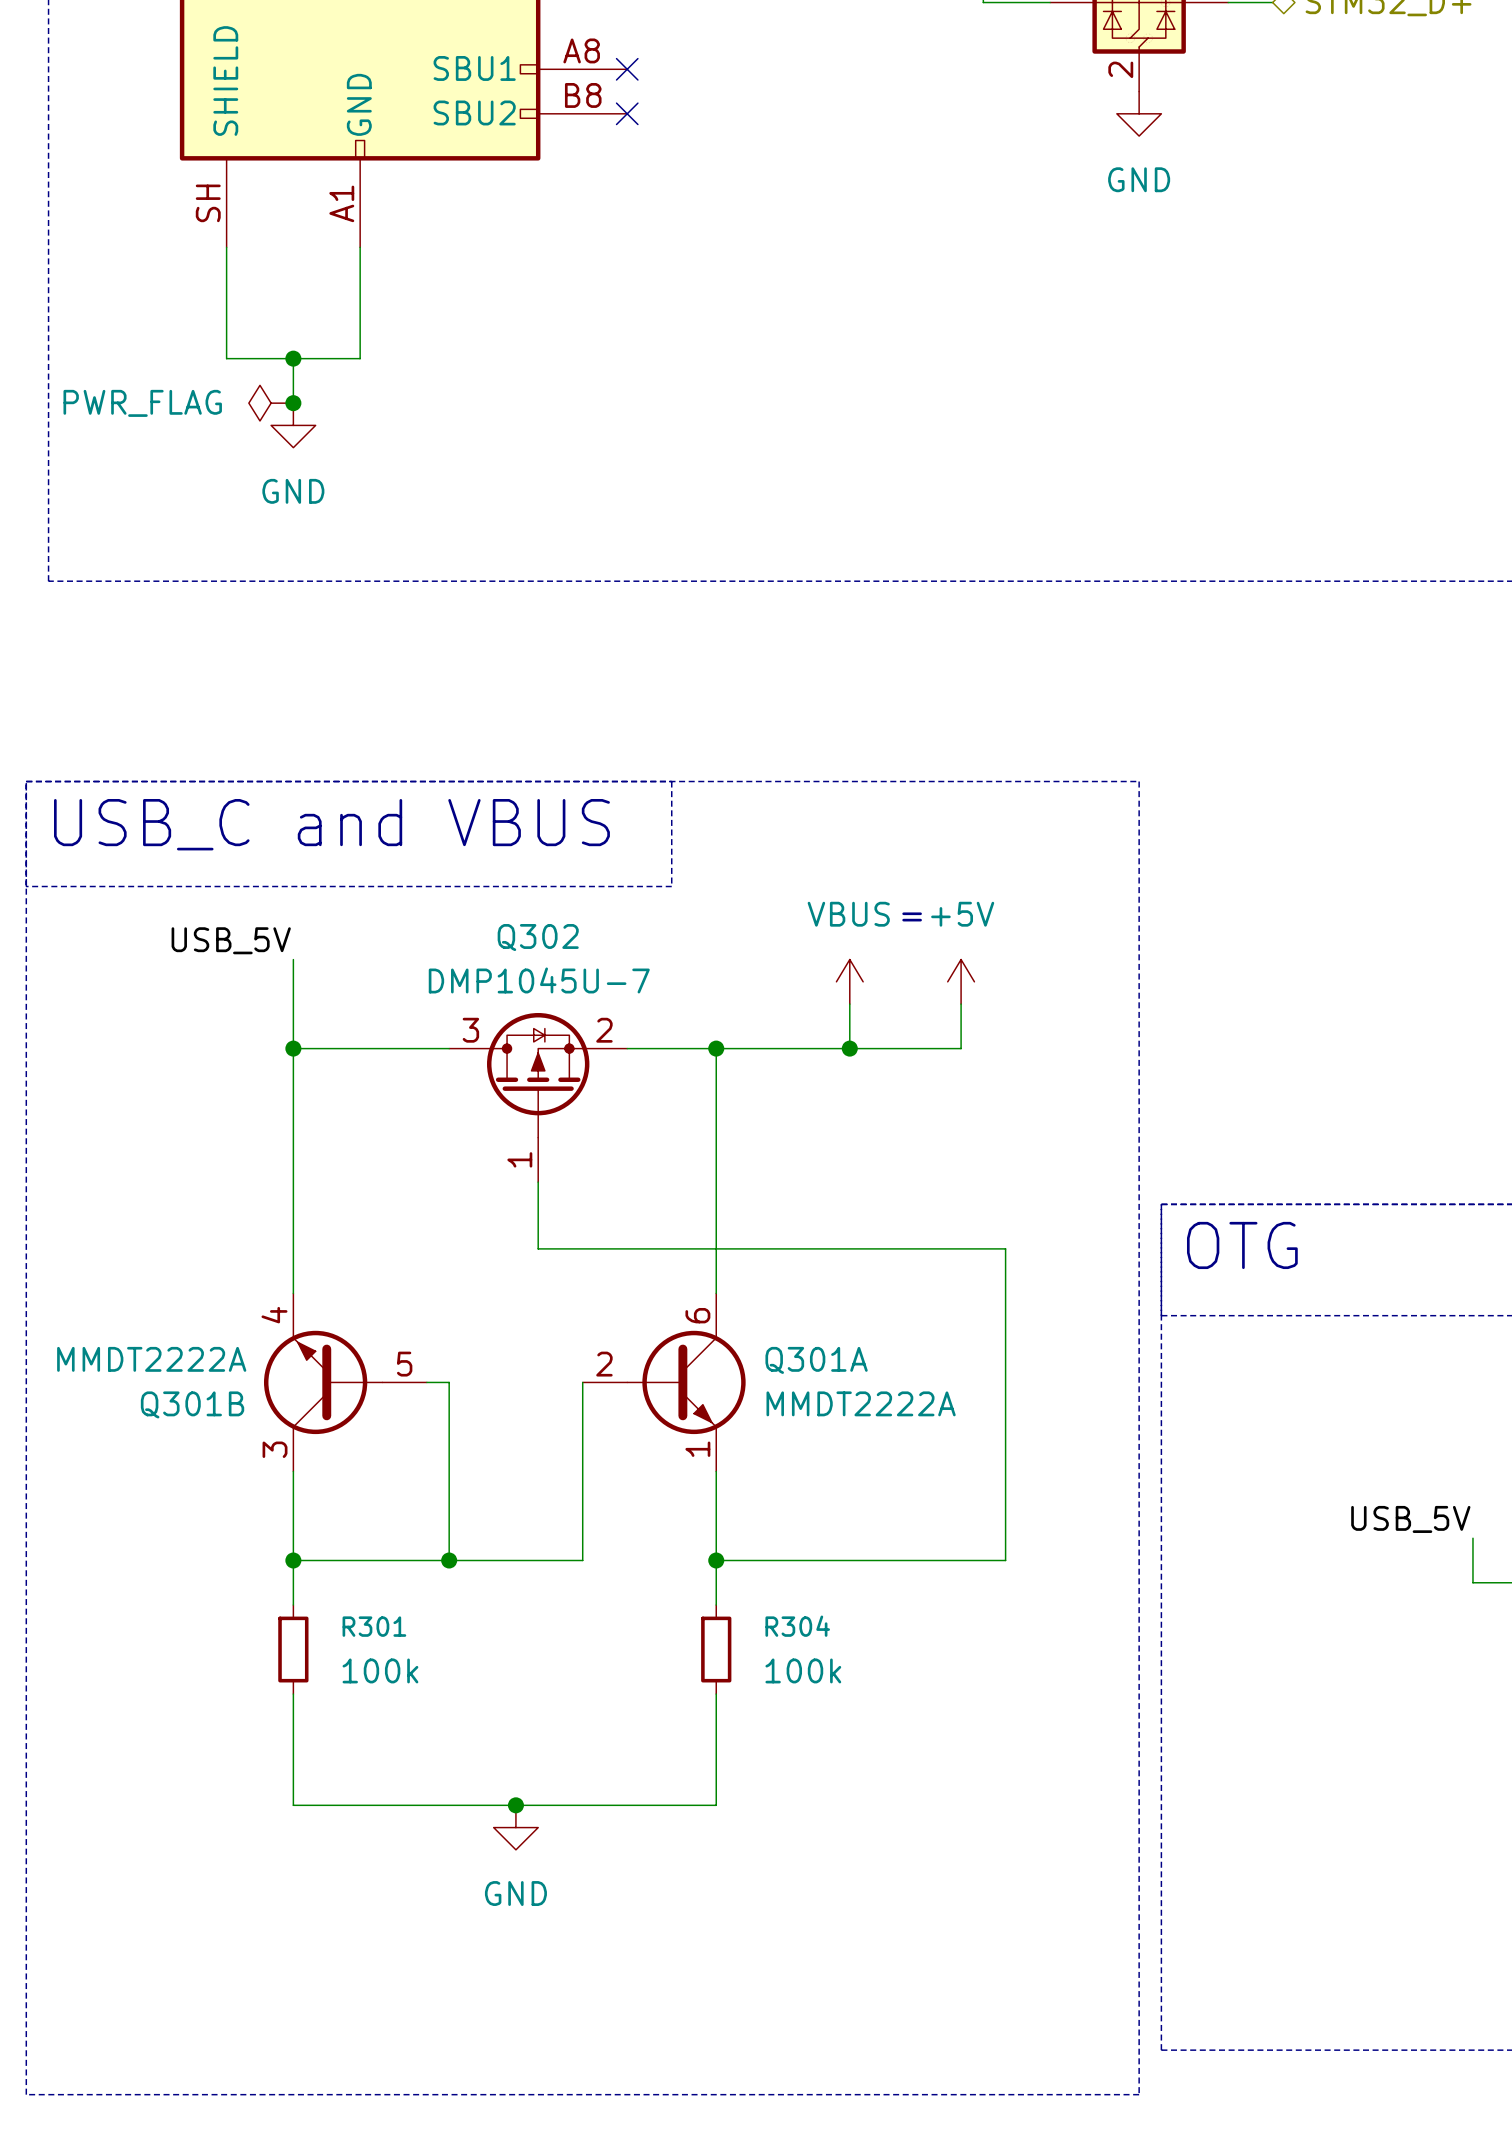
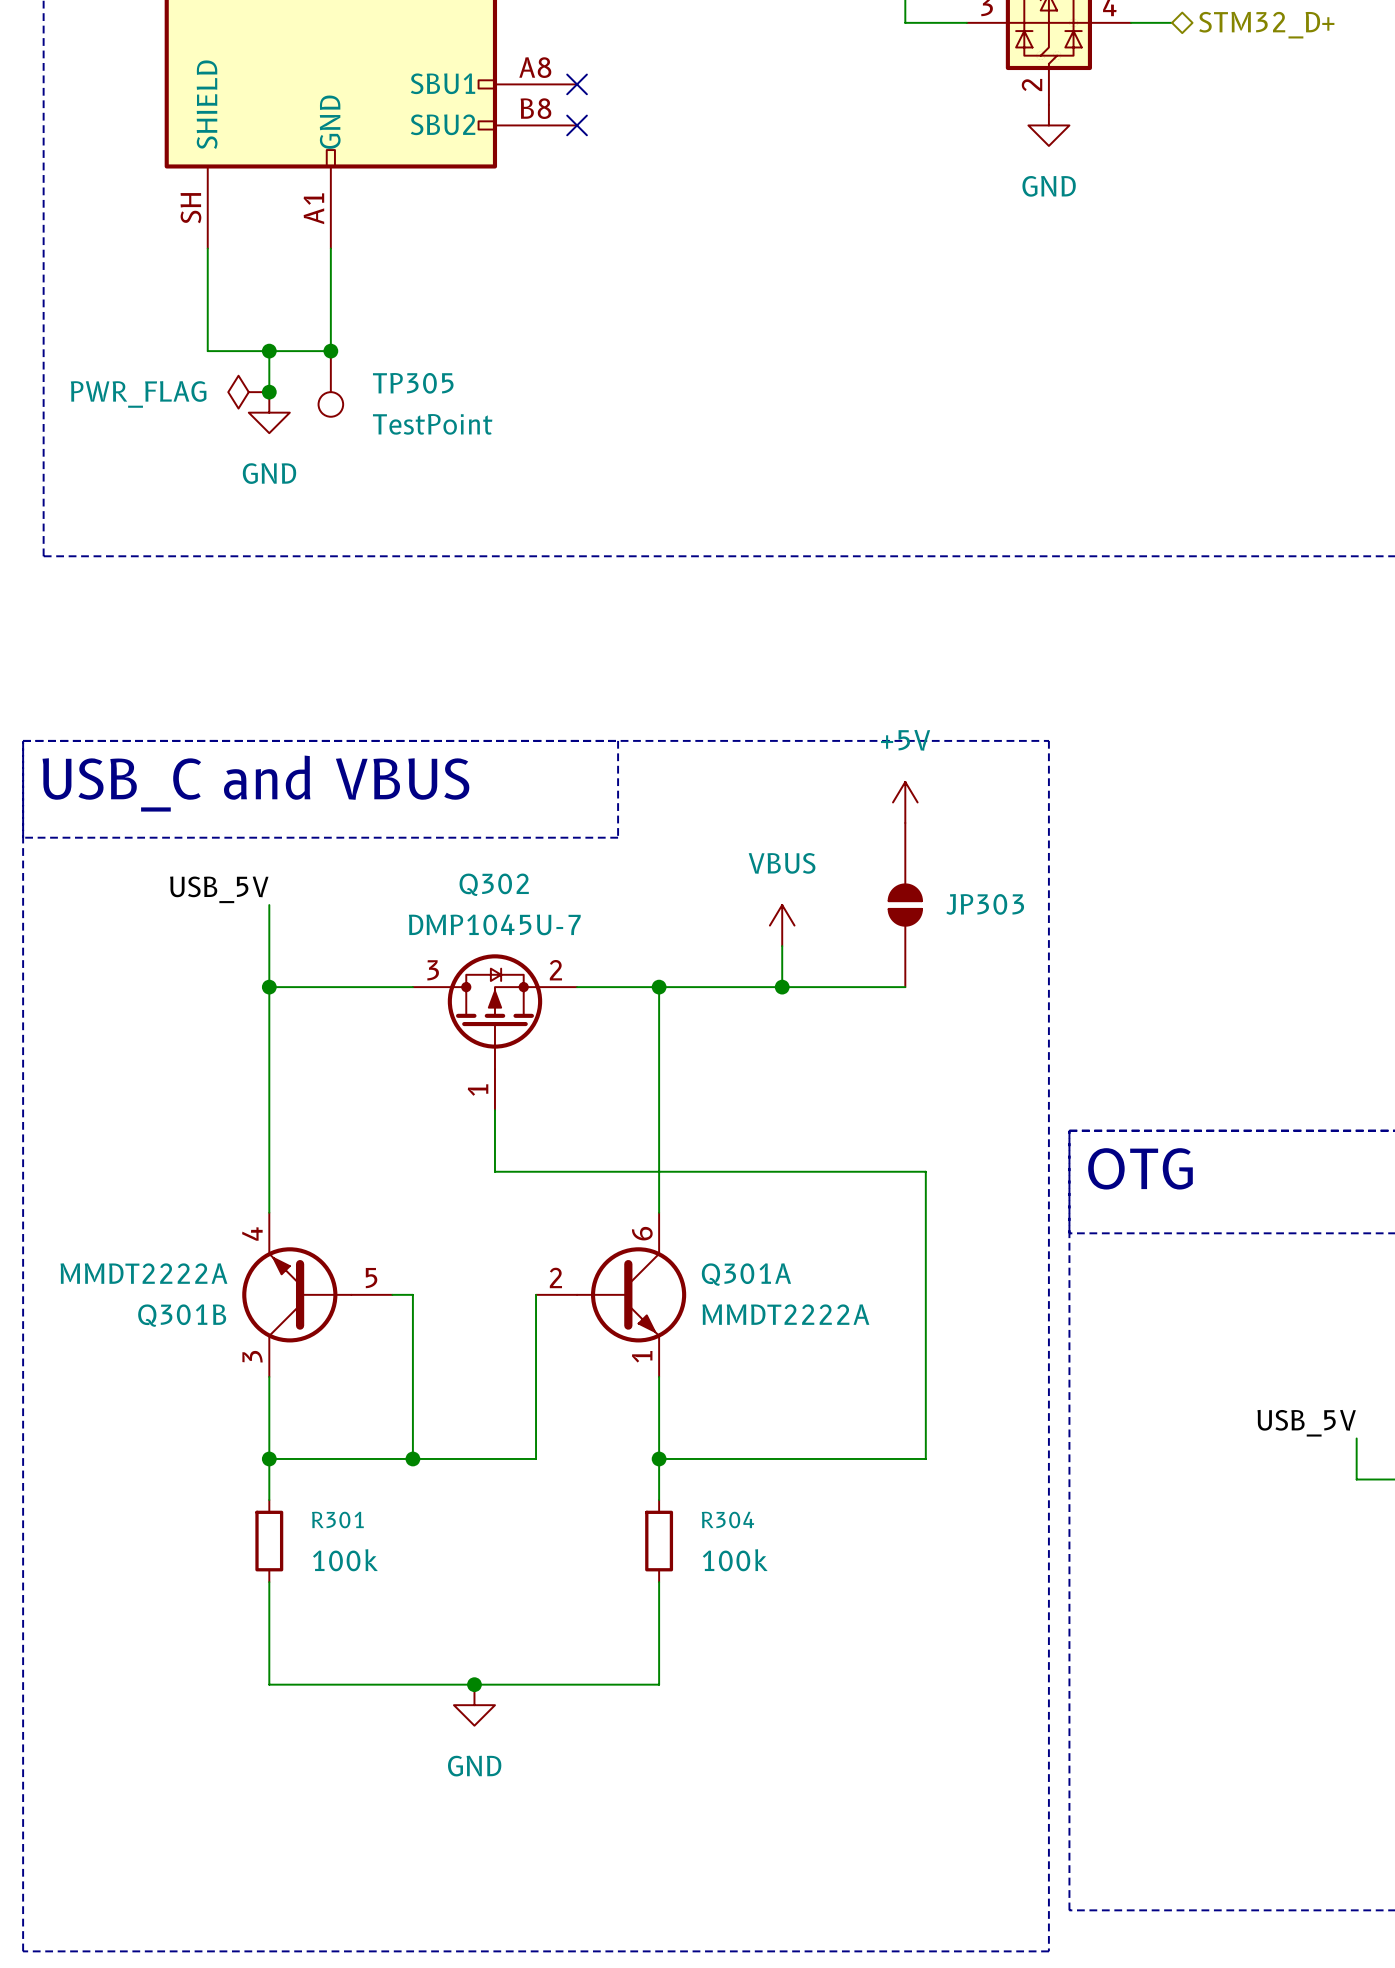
junction: none -> (330, 351)
TP305: none -> TestPoint (330, 383)
text: = (912, 916) -> none
JP303: none -> (905, 905)
power symbol position: +5V (961, 981) -> +5V (905, 802)
wire: (961, 1004) (961, 1048) -> (905, 987) (884, 987)

